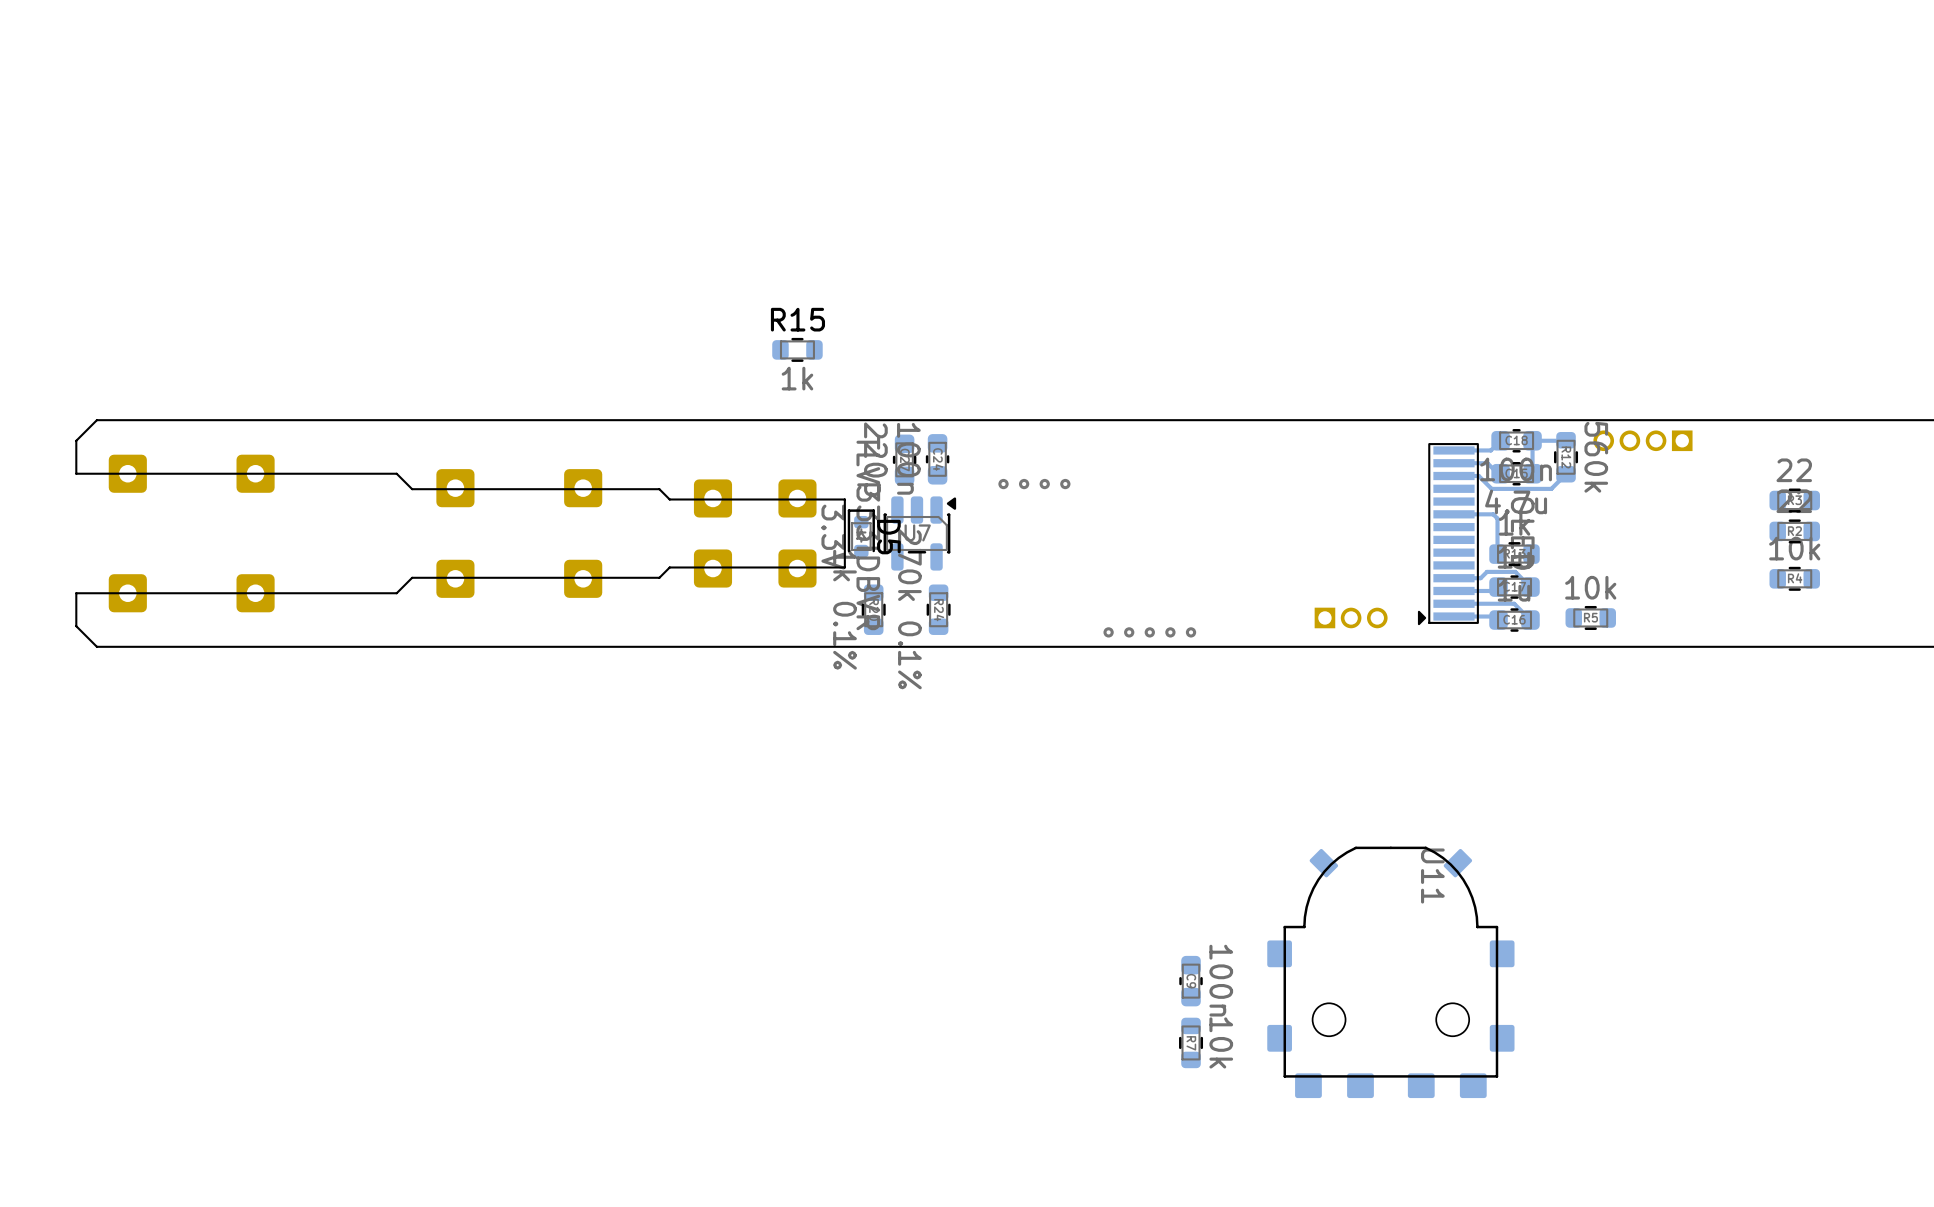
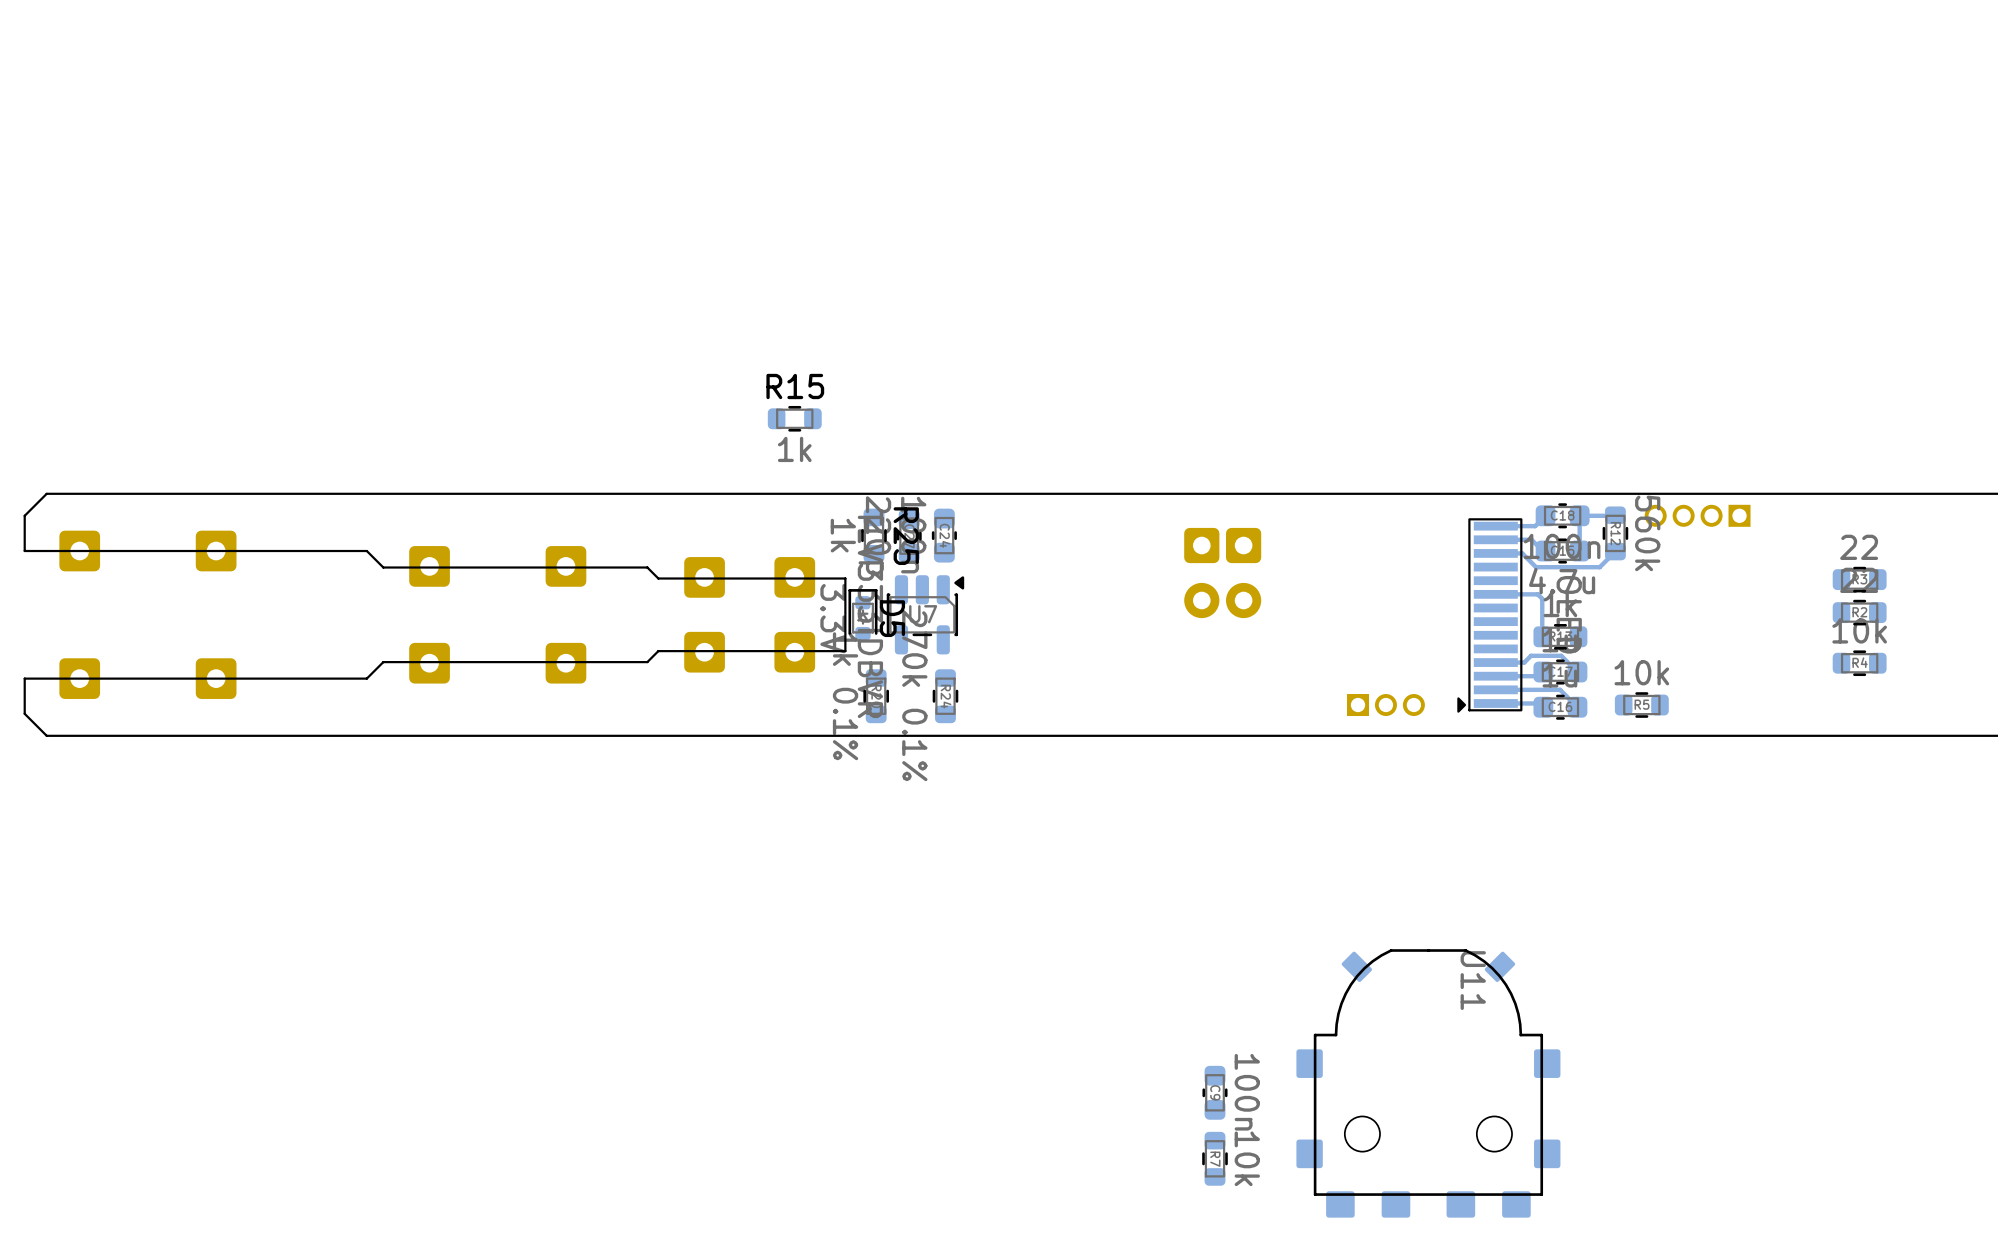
R25: none -> 1k (873, 535)
via: (1003, 484) -> none
via: (1024, 484) -> none
via: (1044, 484) -> none
via: (1065, 484) -> none
part: none -> (1201, 573)
part: none -> (1243, 573)
via: (1108, 632) -> none
via: (1129, 632) -> none
via: (1149, 632) -> none
via: (1170, 632) -> none
via: (1191, 632) -> none

